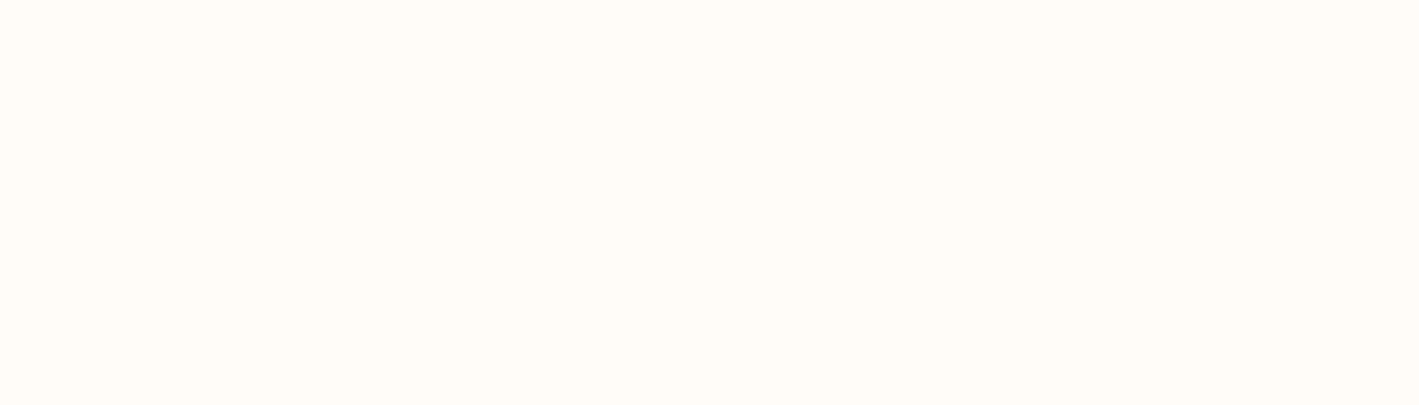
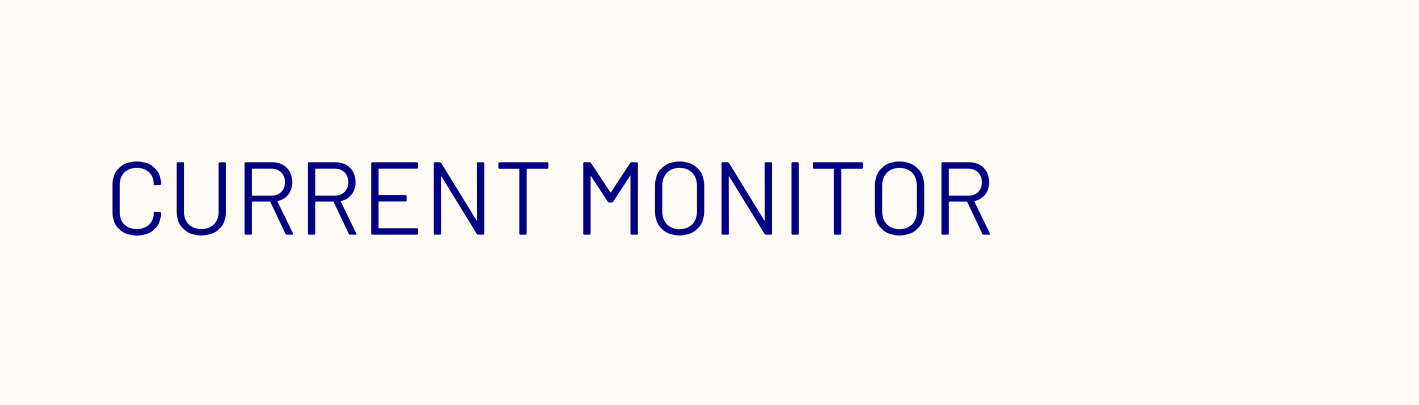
text: none -> CURRENT MONITOR (551, 198)

